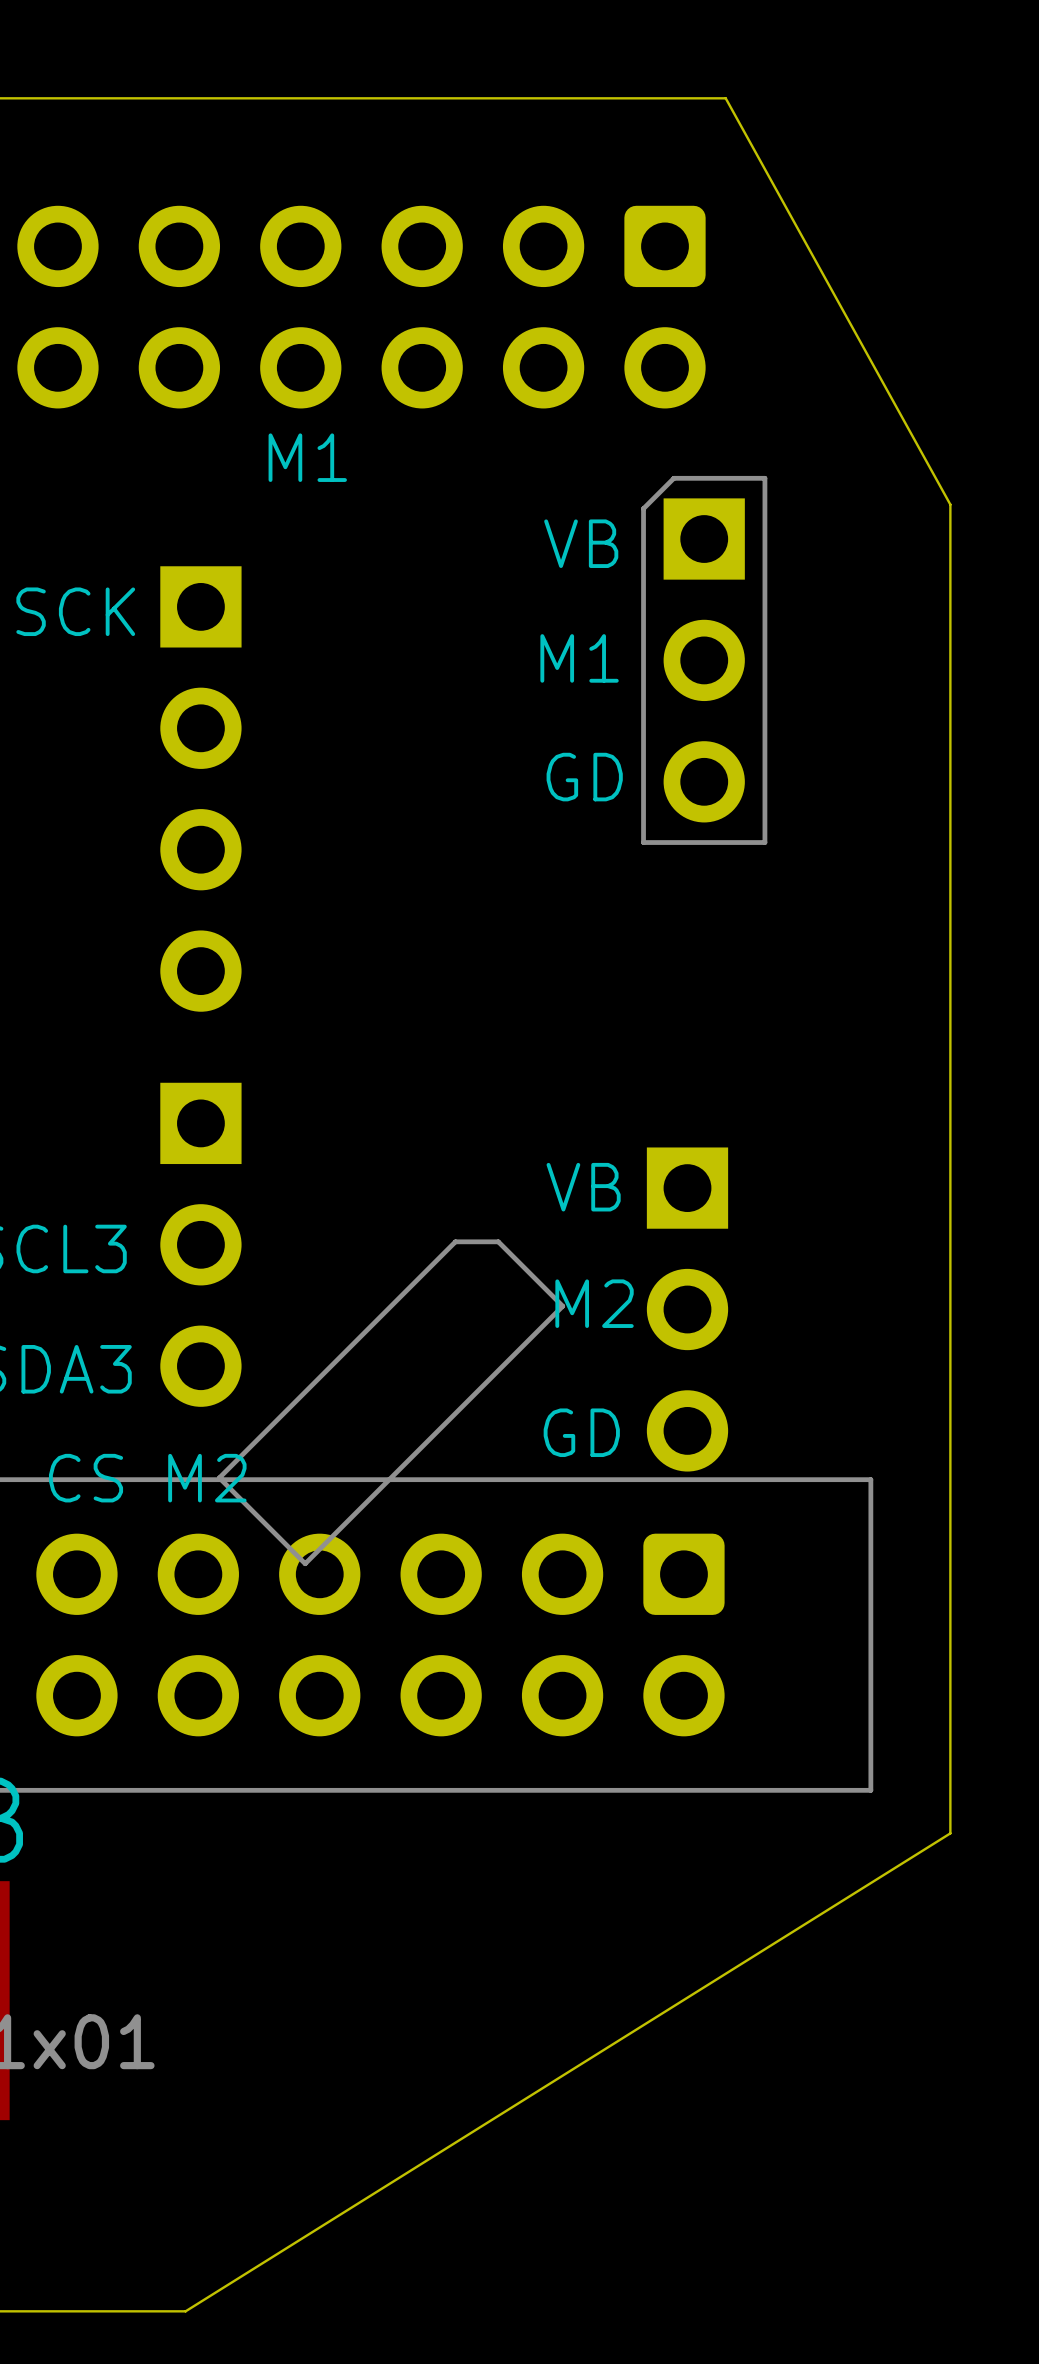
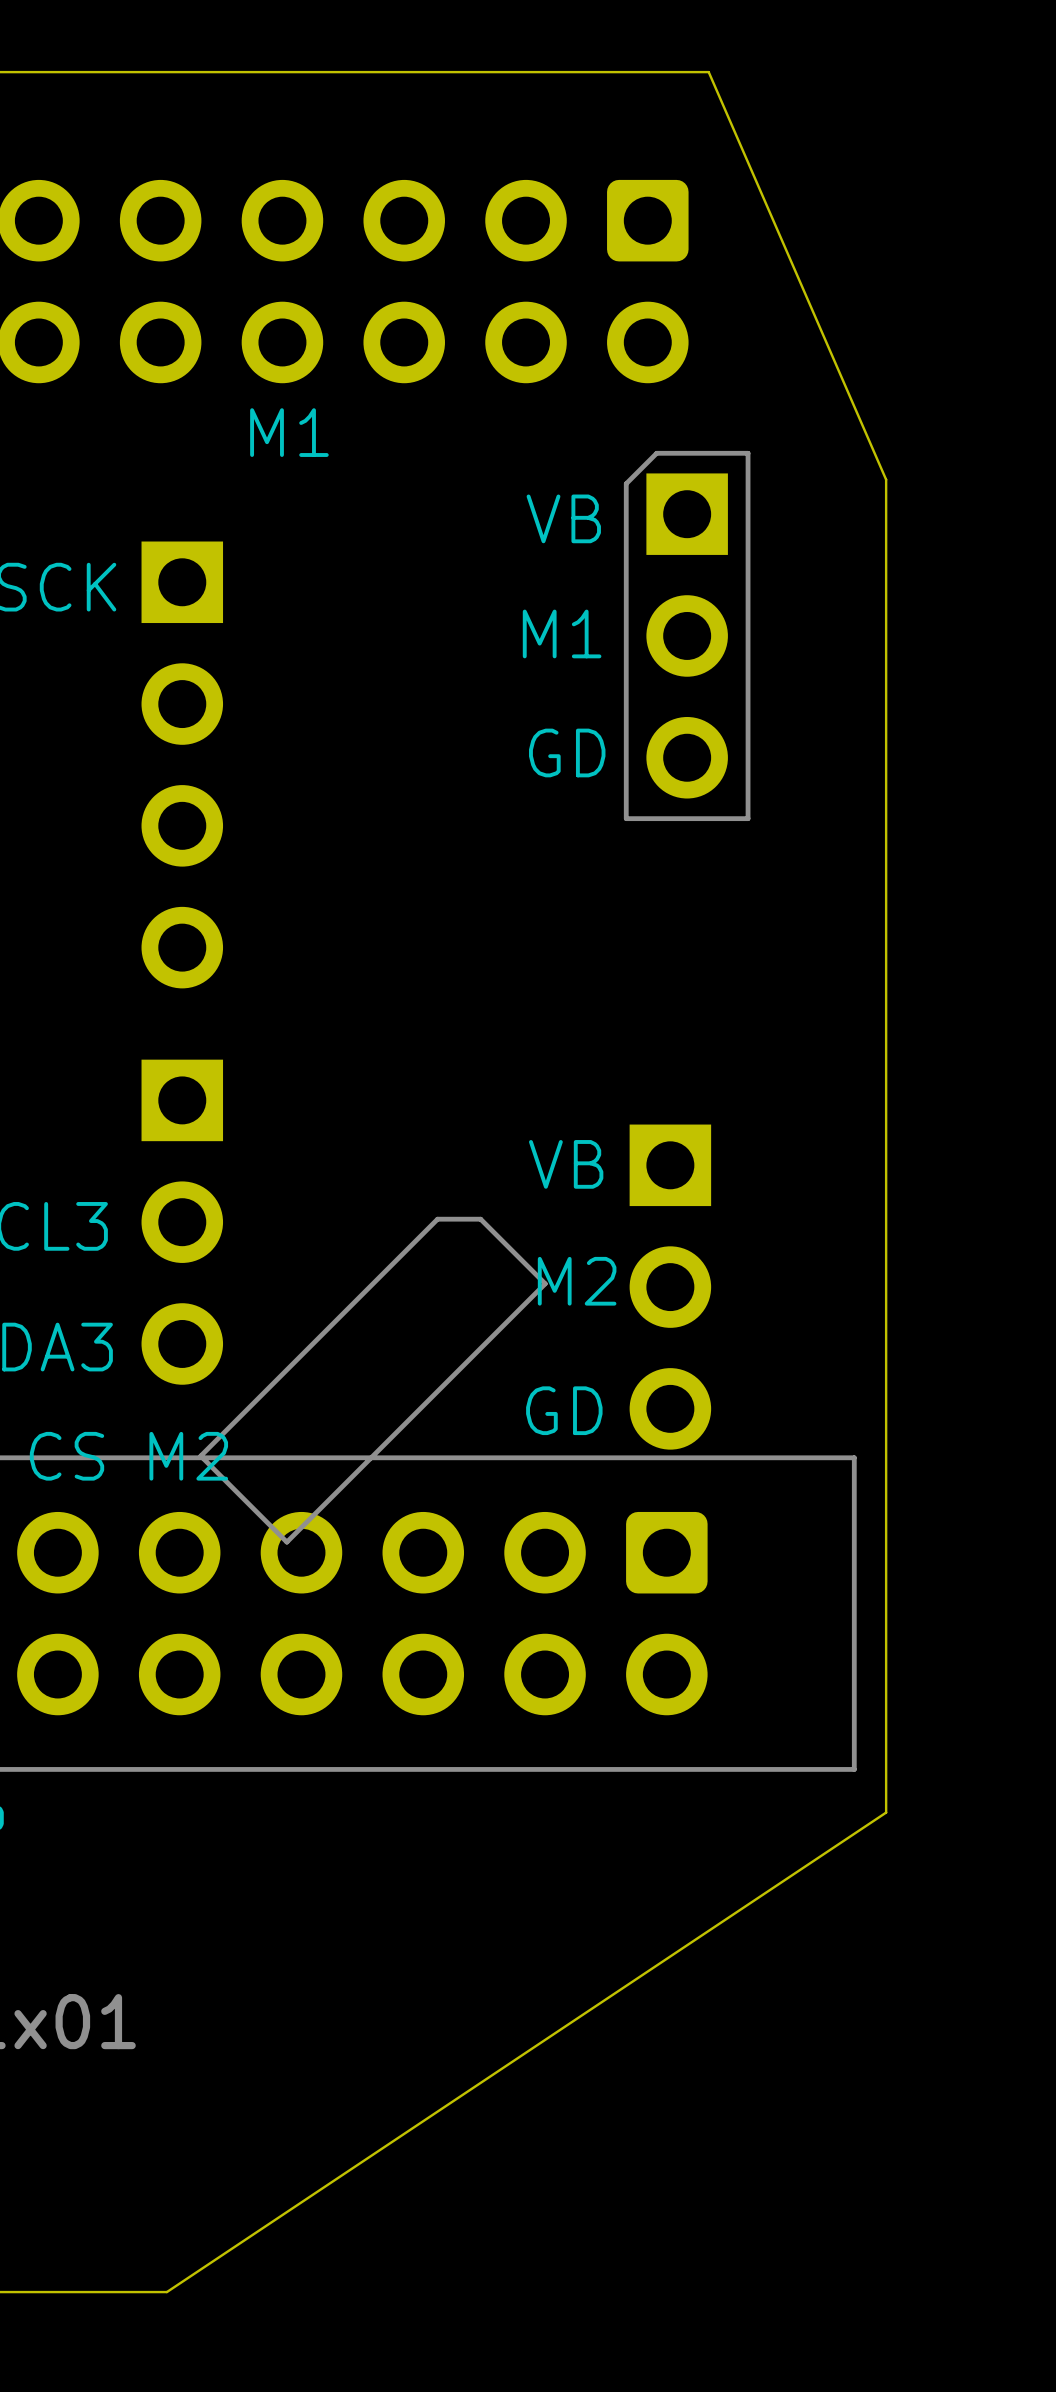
board edge: (725, 98) (950, 504) (950, 1833) (185, 2311) -> (708, 72) (886, 479) (886, 1812) (166, 2292)

